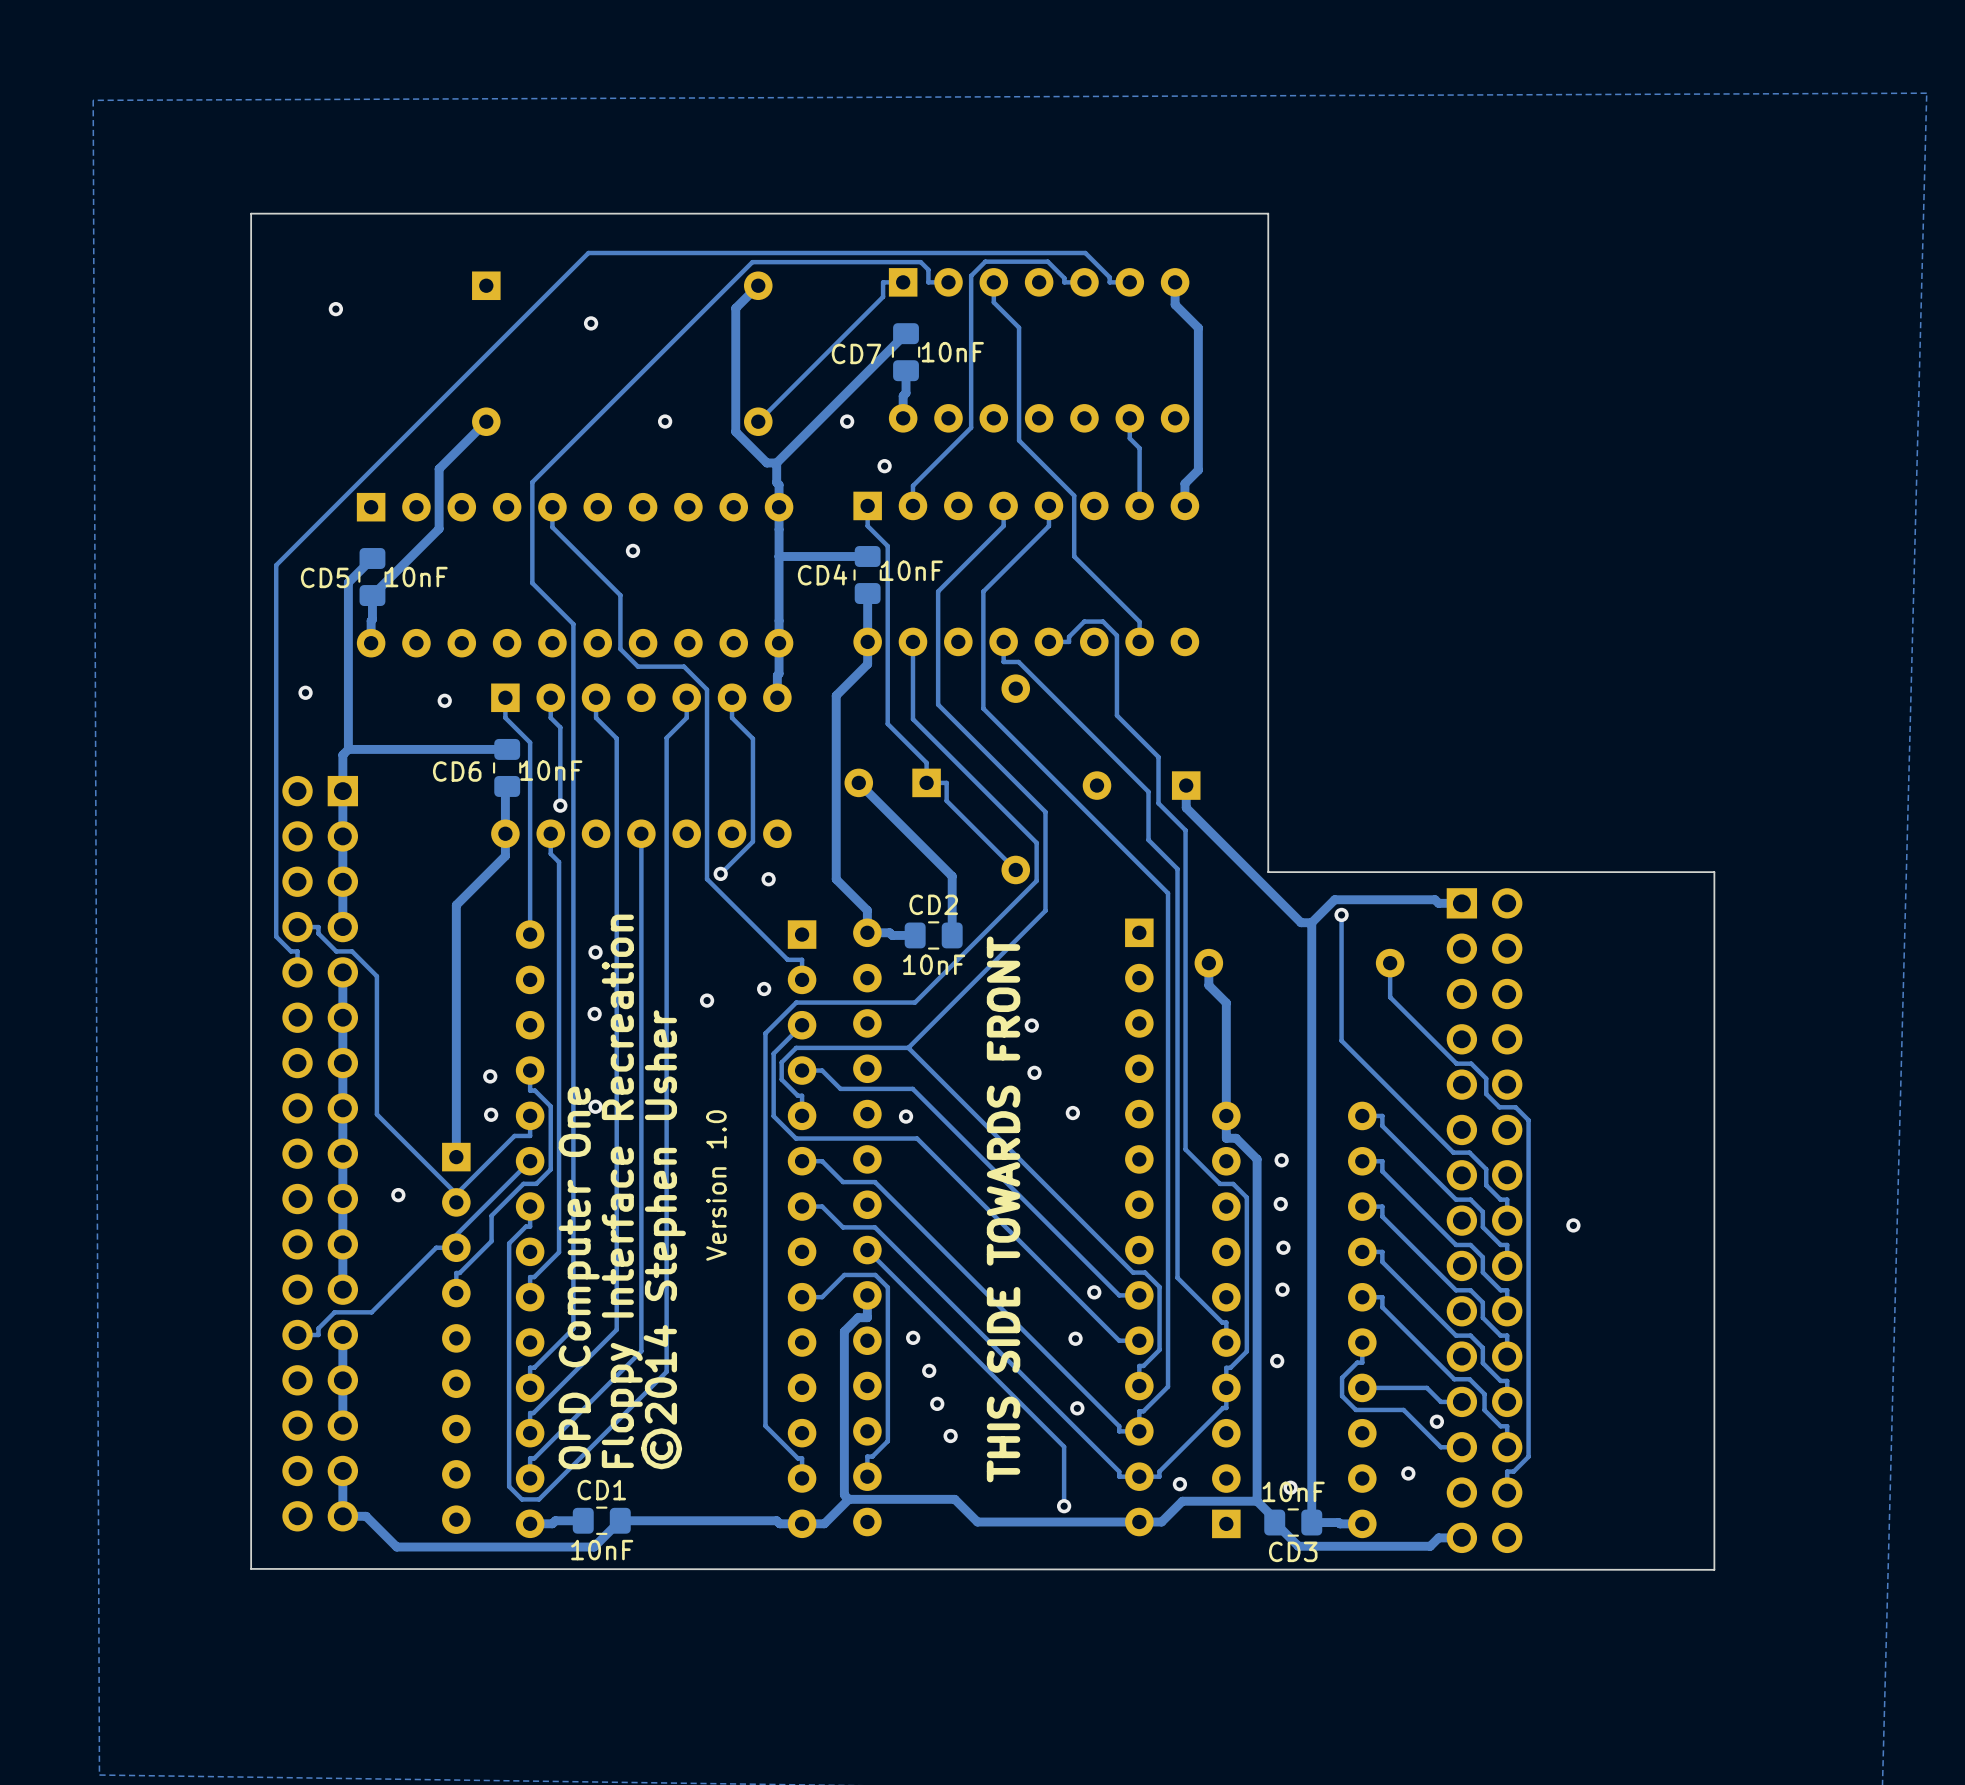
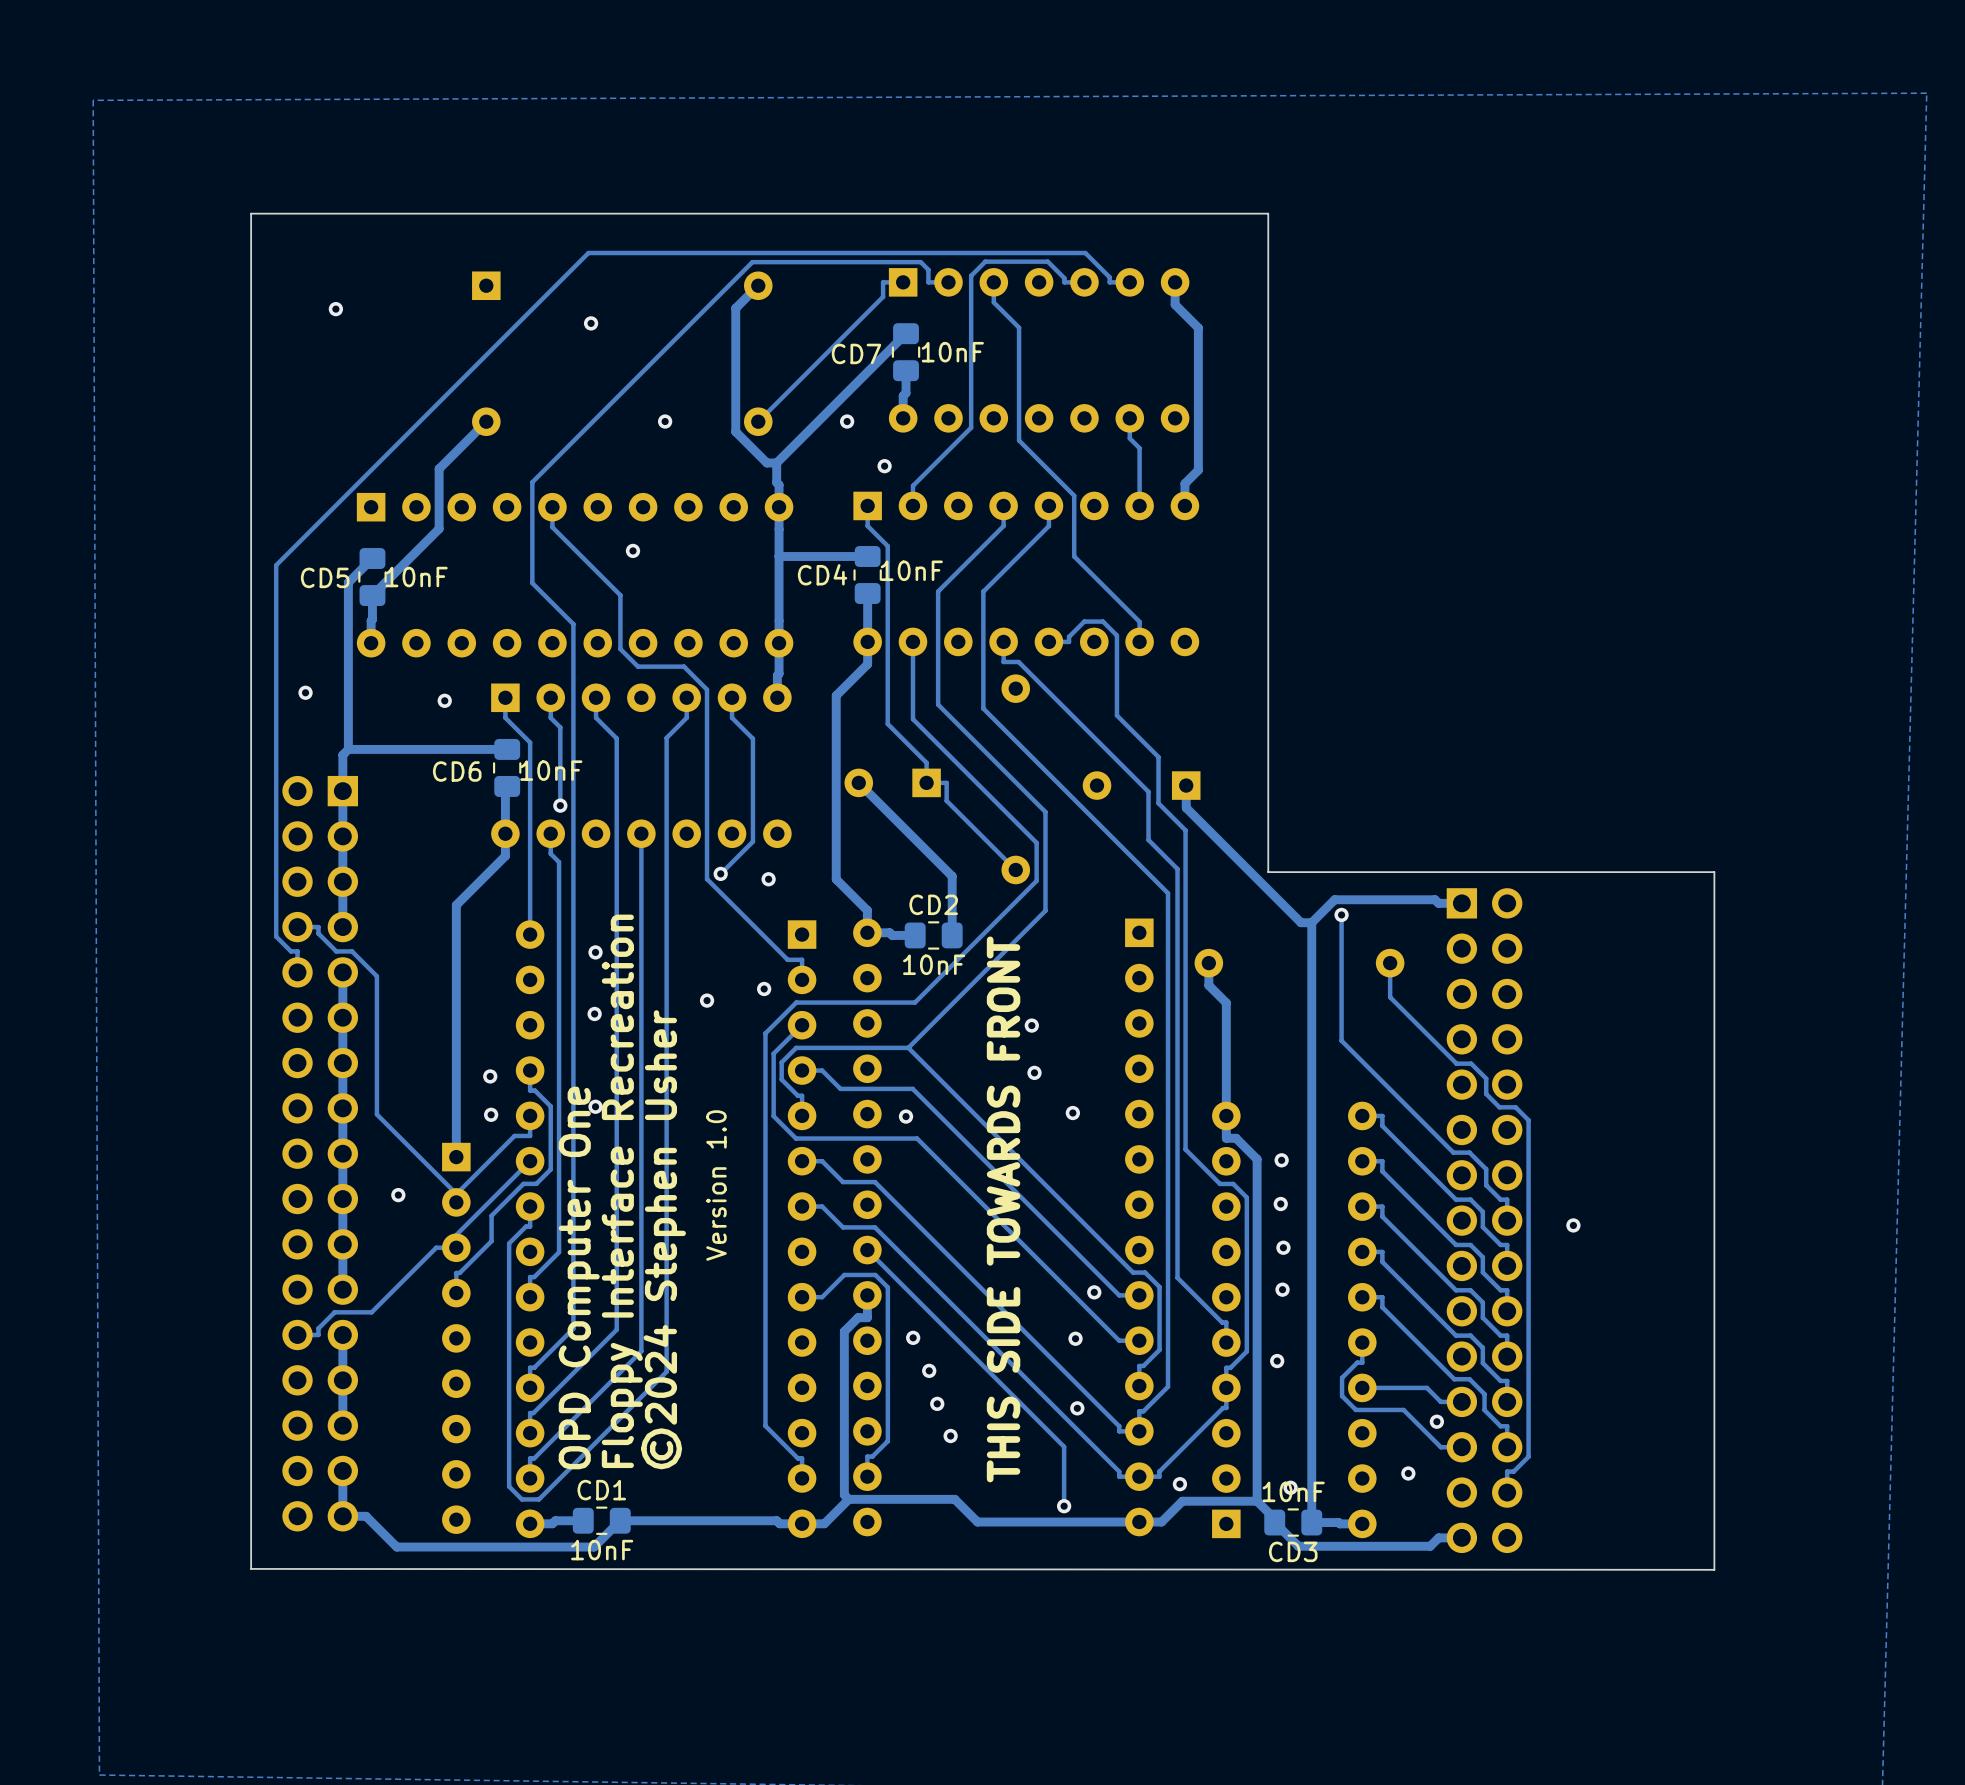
text: ©2014 Stephen Usher (663, 1239) -> ©2024 Stephen Usher (663, 1239)

